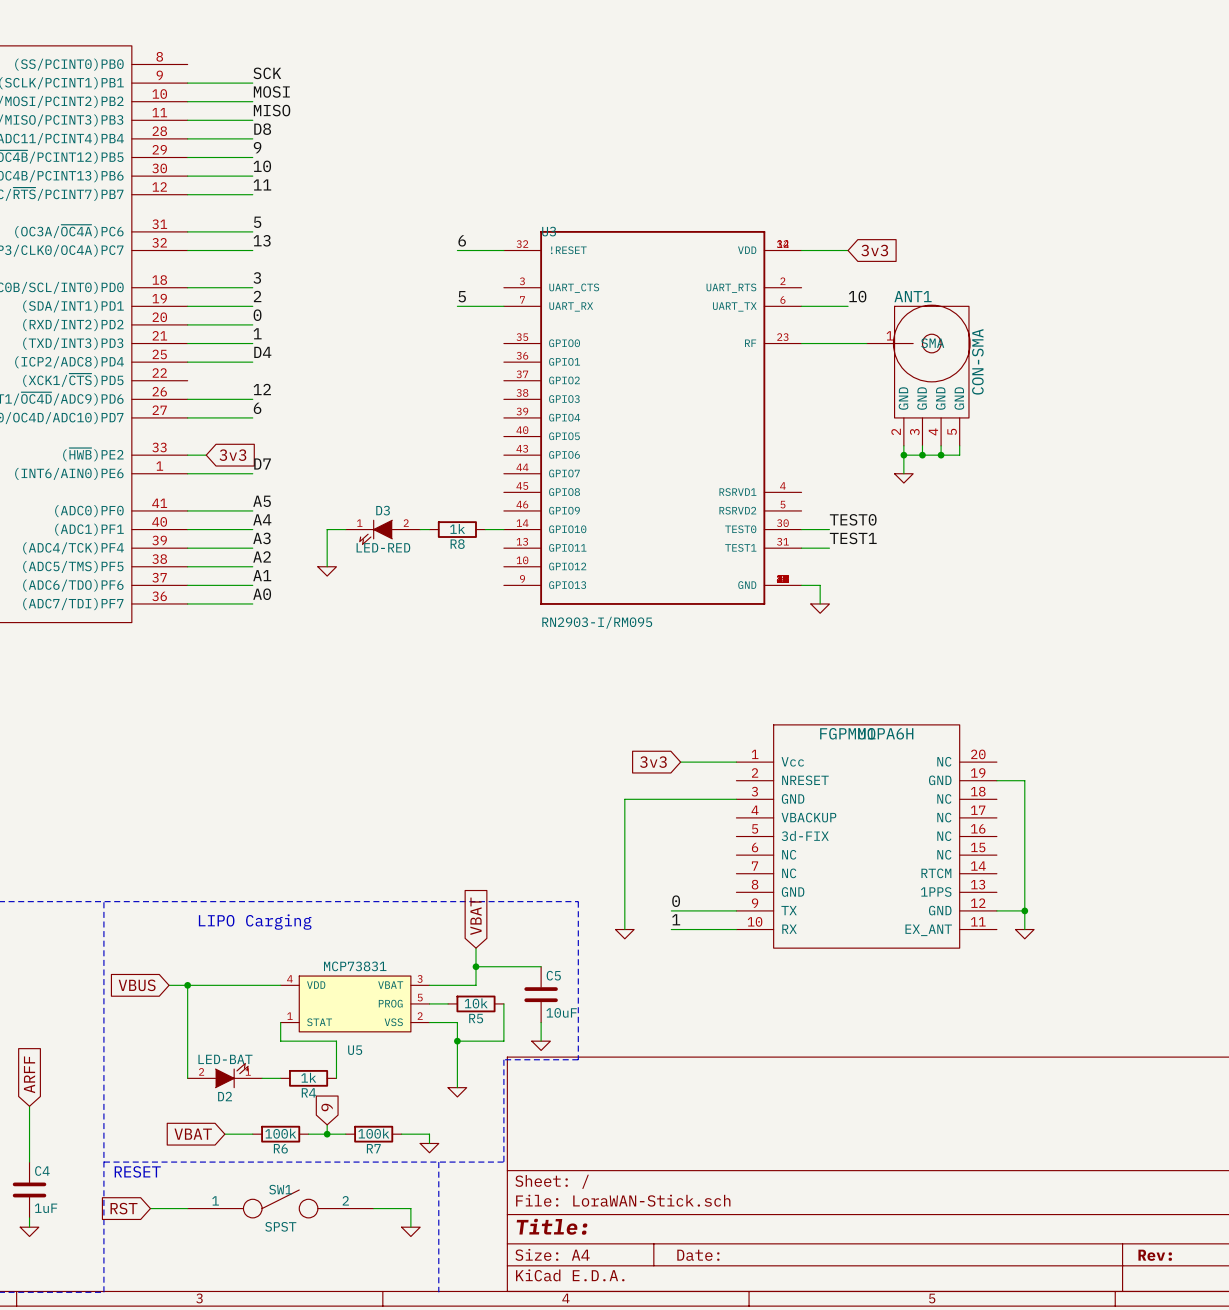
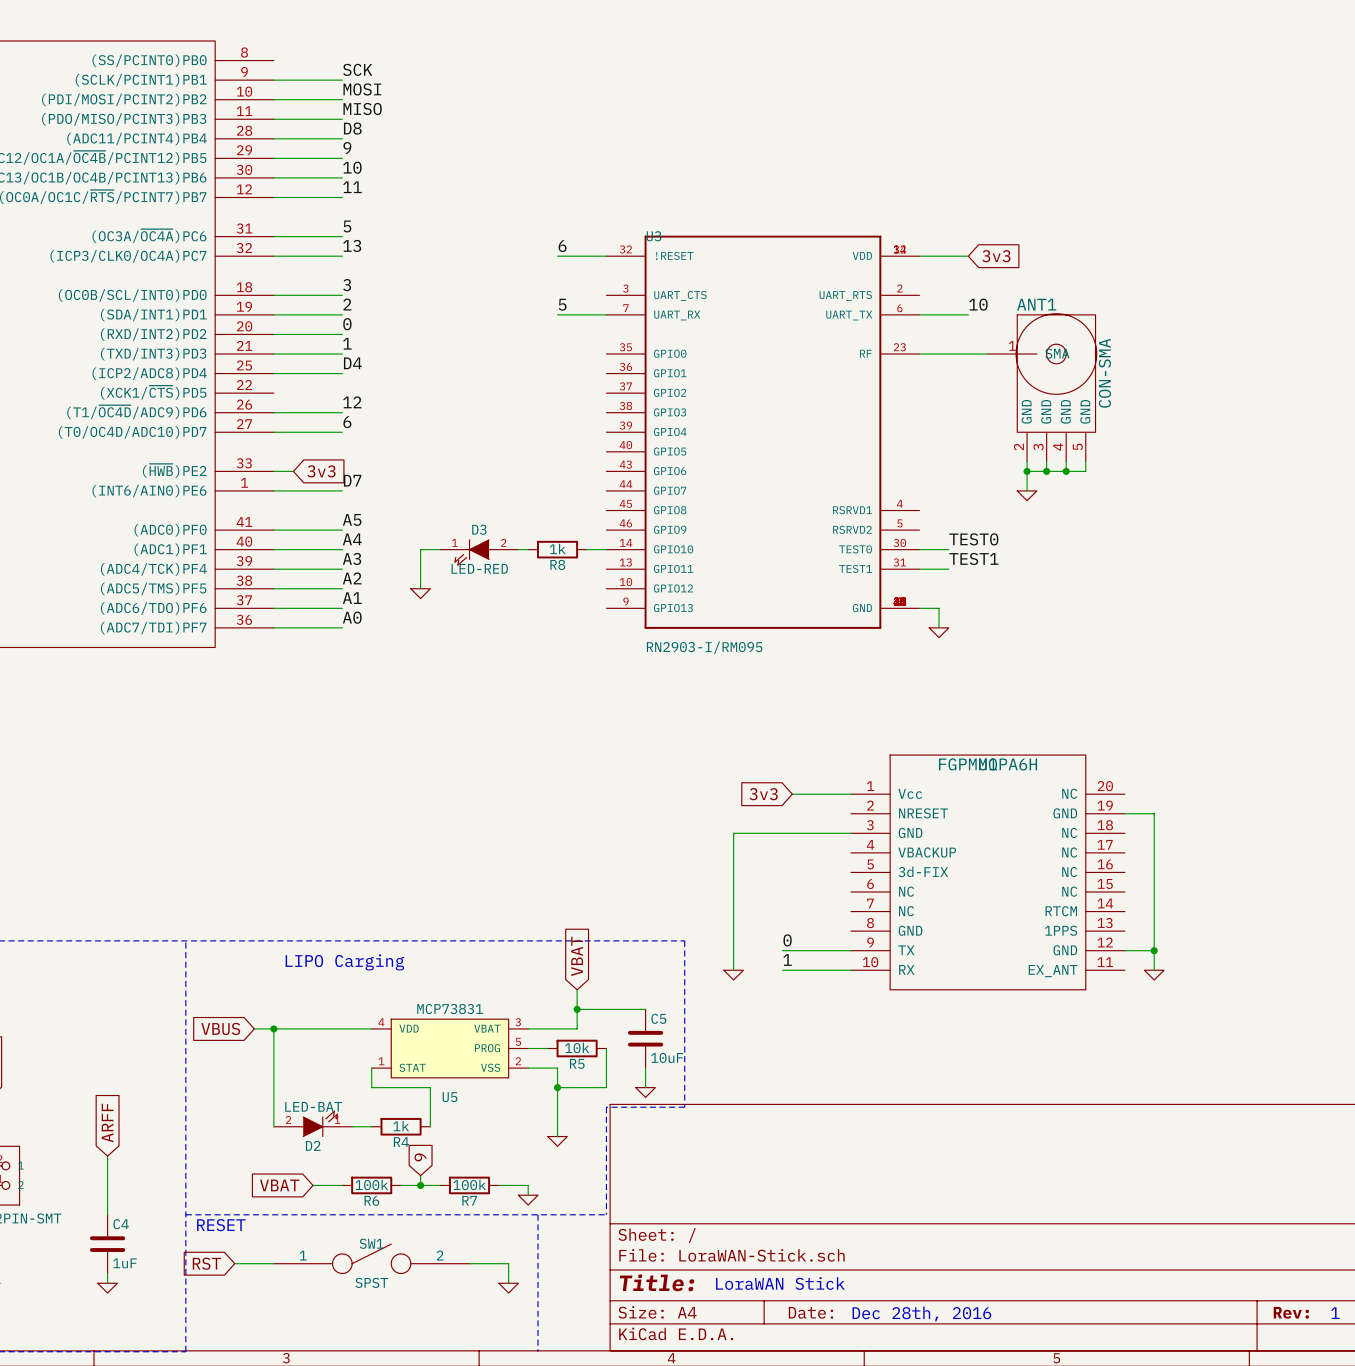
text: none -> LoraWAN Stick (780, 1283)
text: none -> 1 (1335, 1313)
text: none -> Dec 28th, 2016 (921, 1313)

